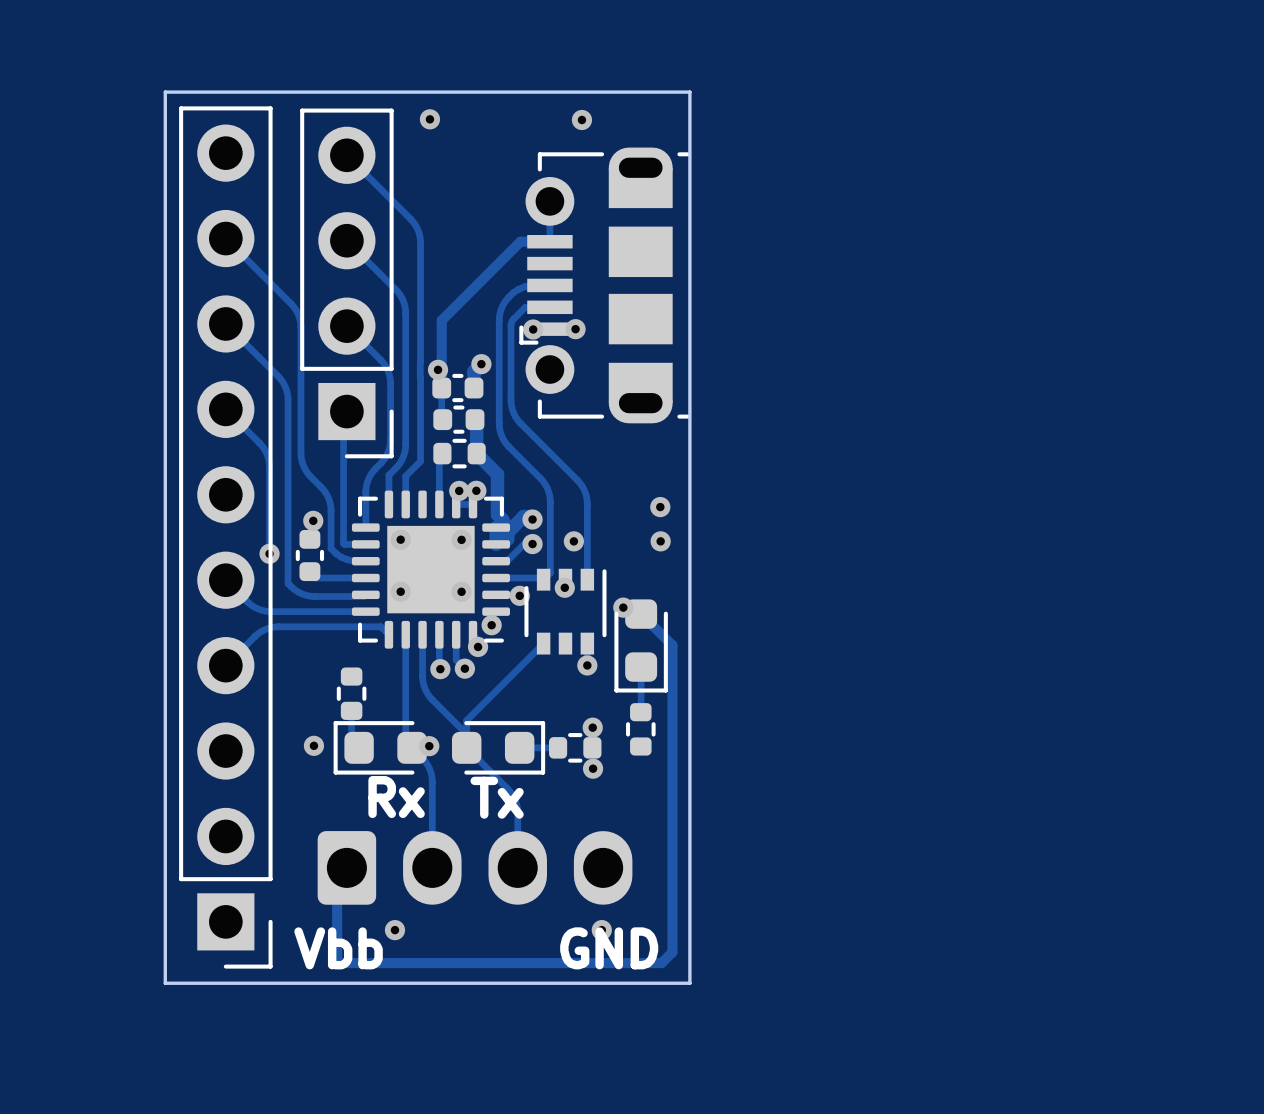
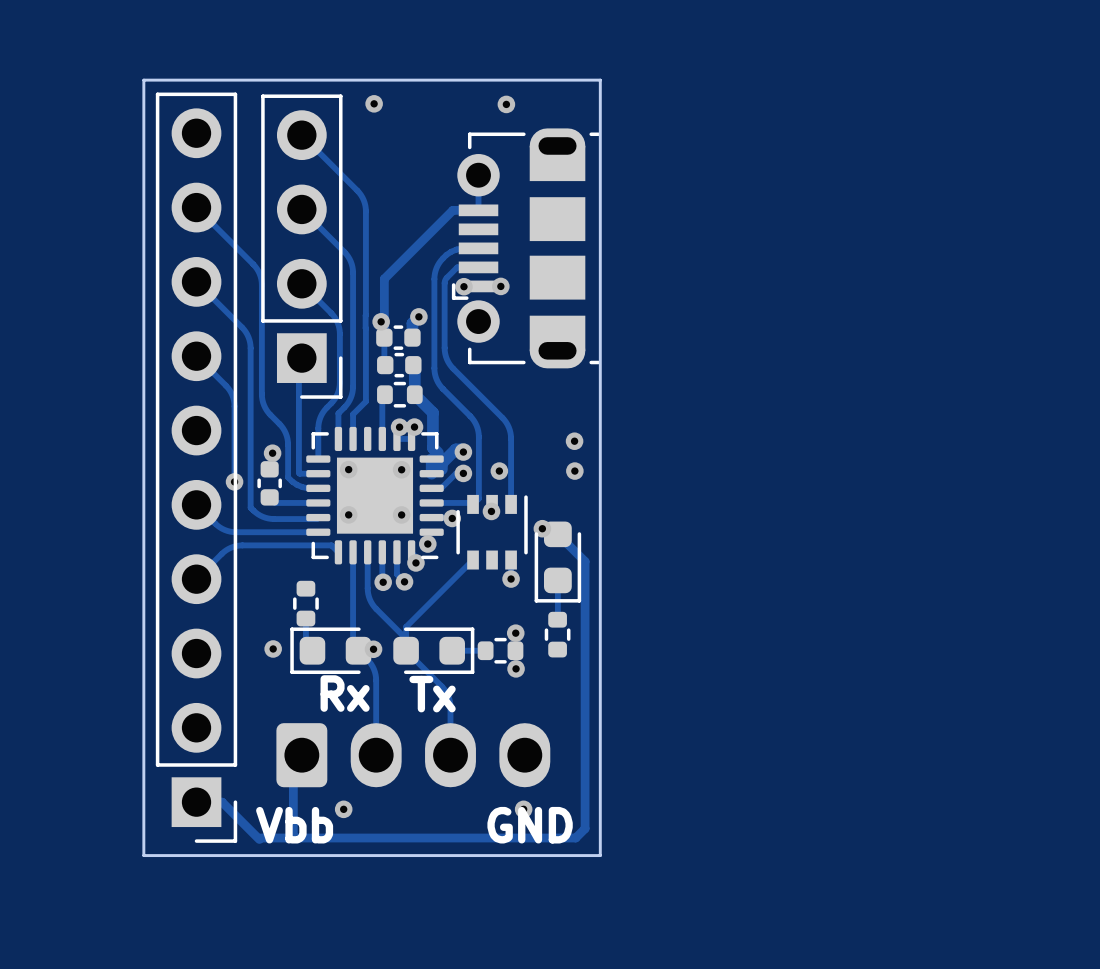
track: none -> (196, 802) (222, 802) (259, 839) (293, 838)

